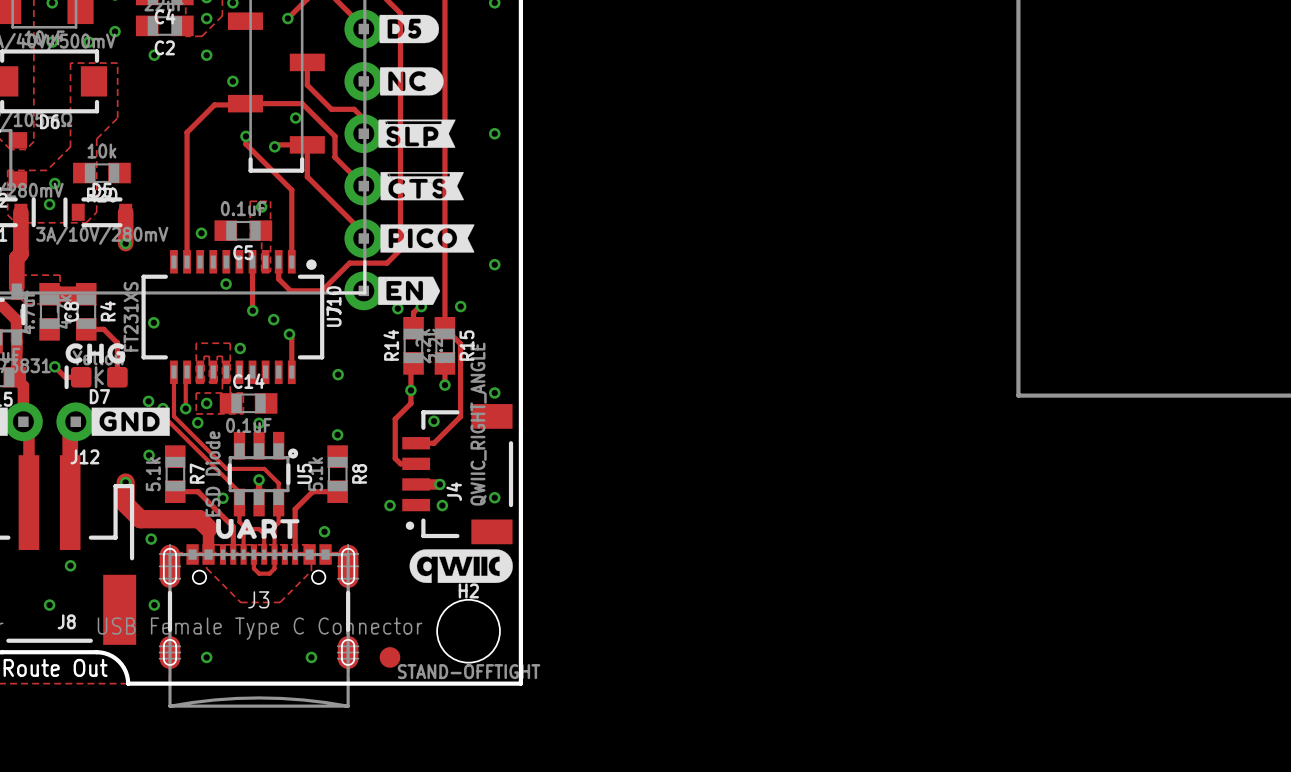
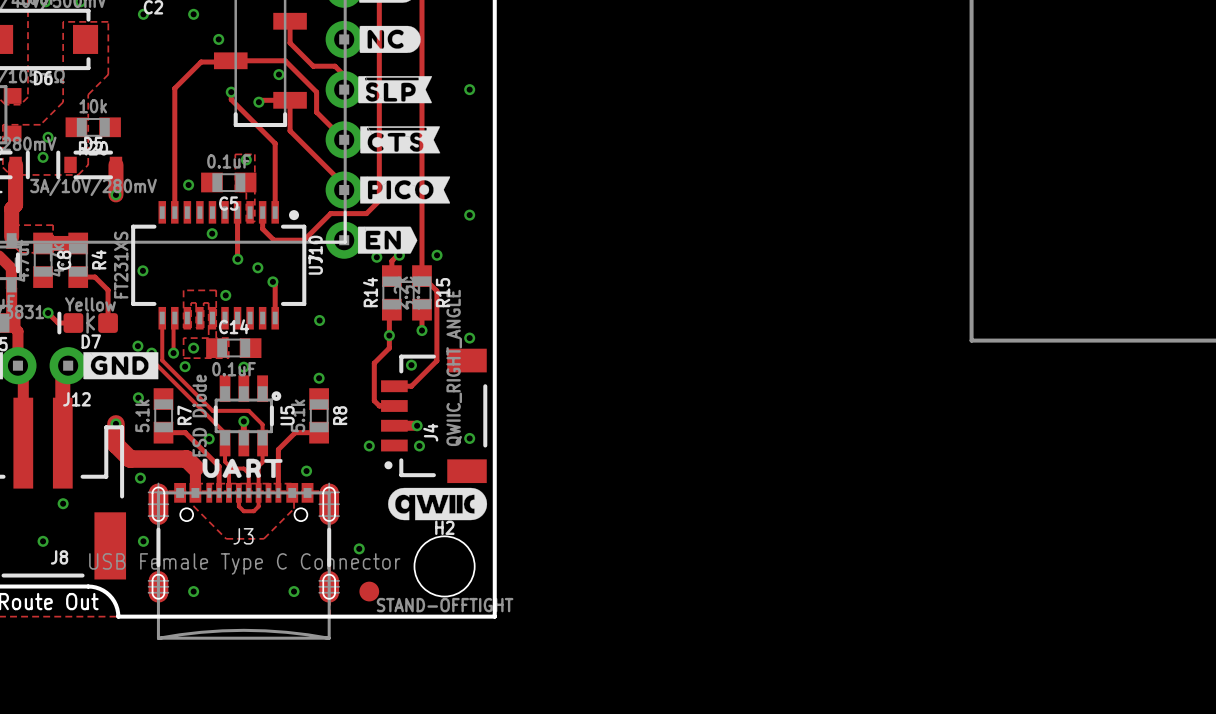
drawing: [65, 343, 126, 364] -> none
via: none -> (359, 548)

